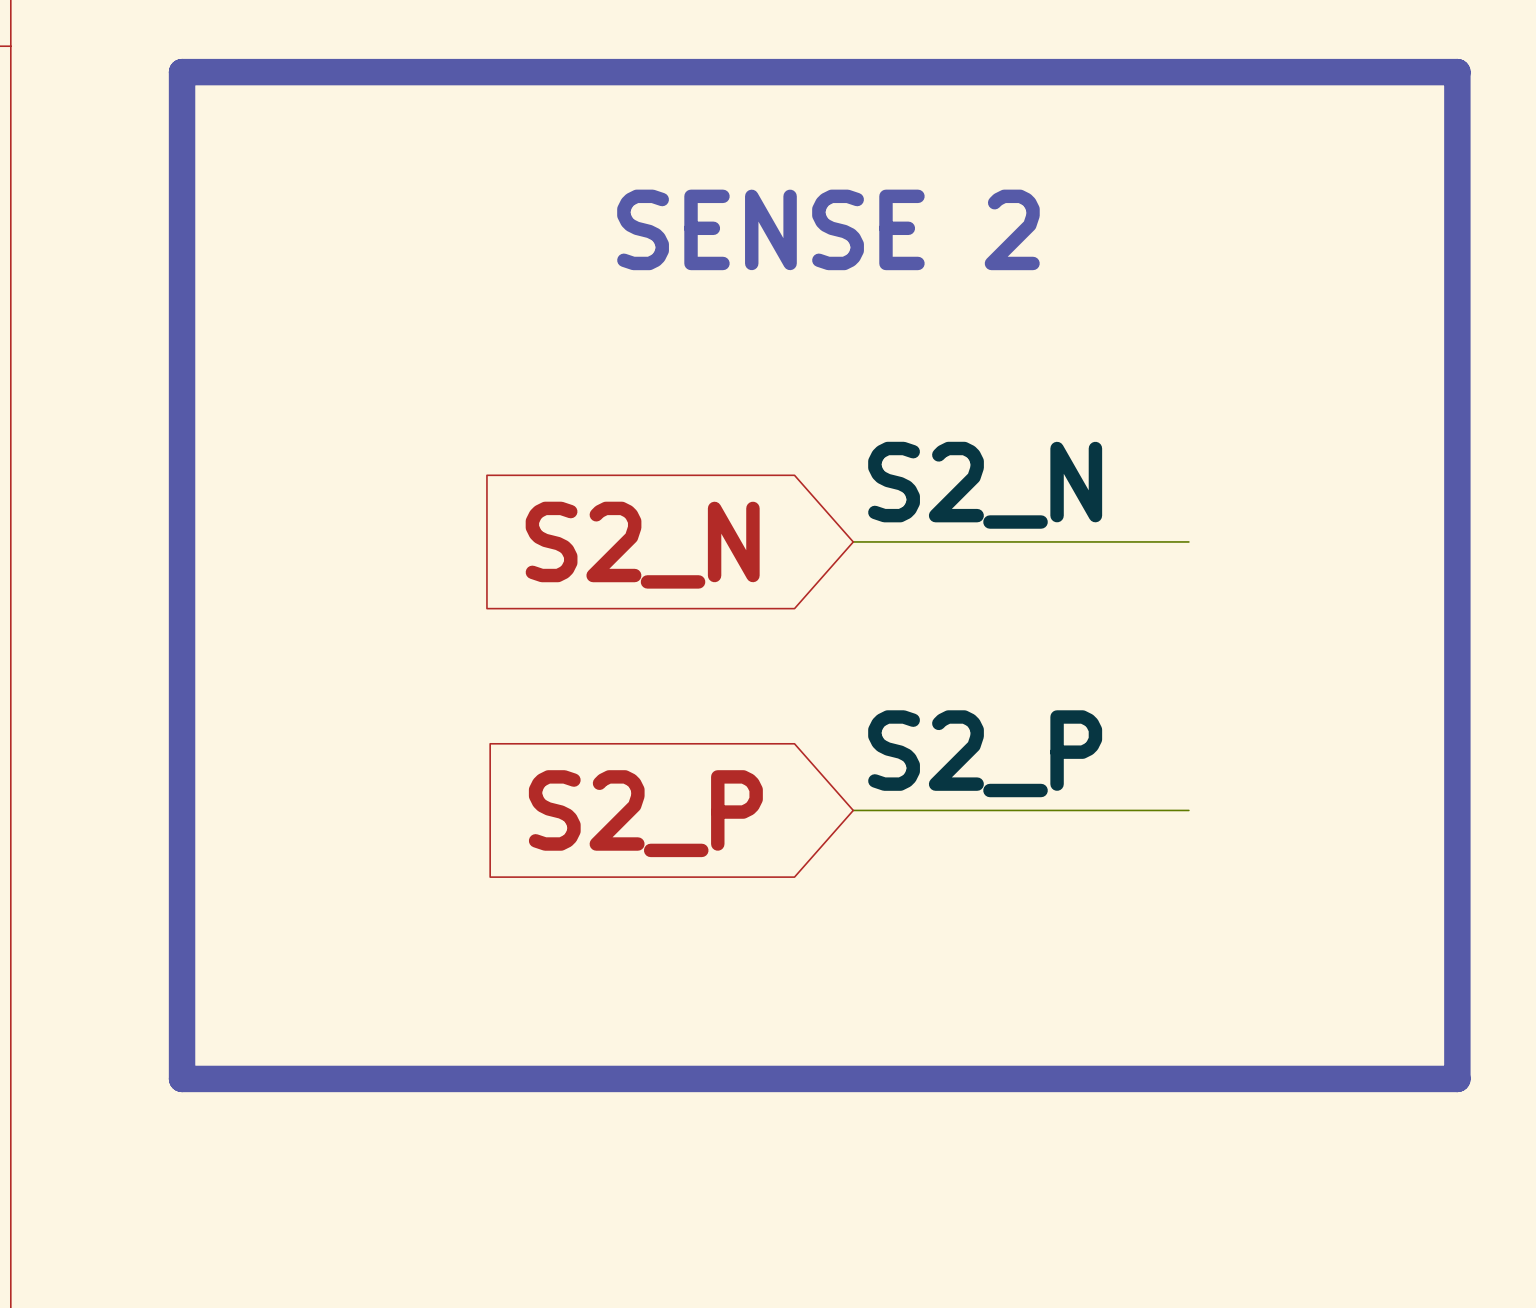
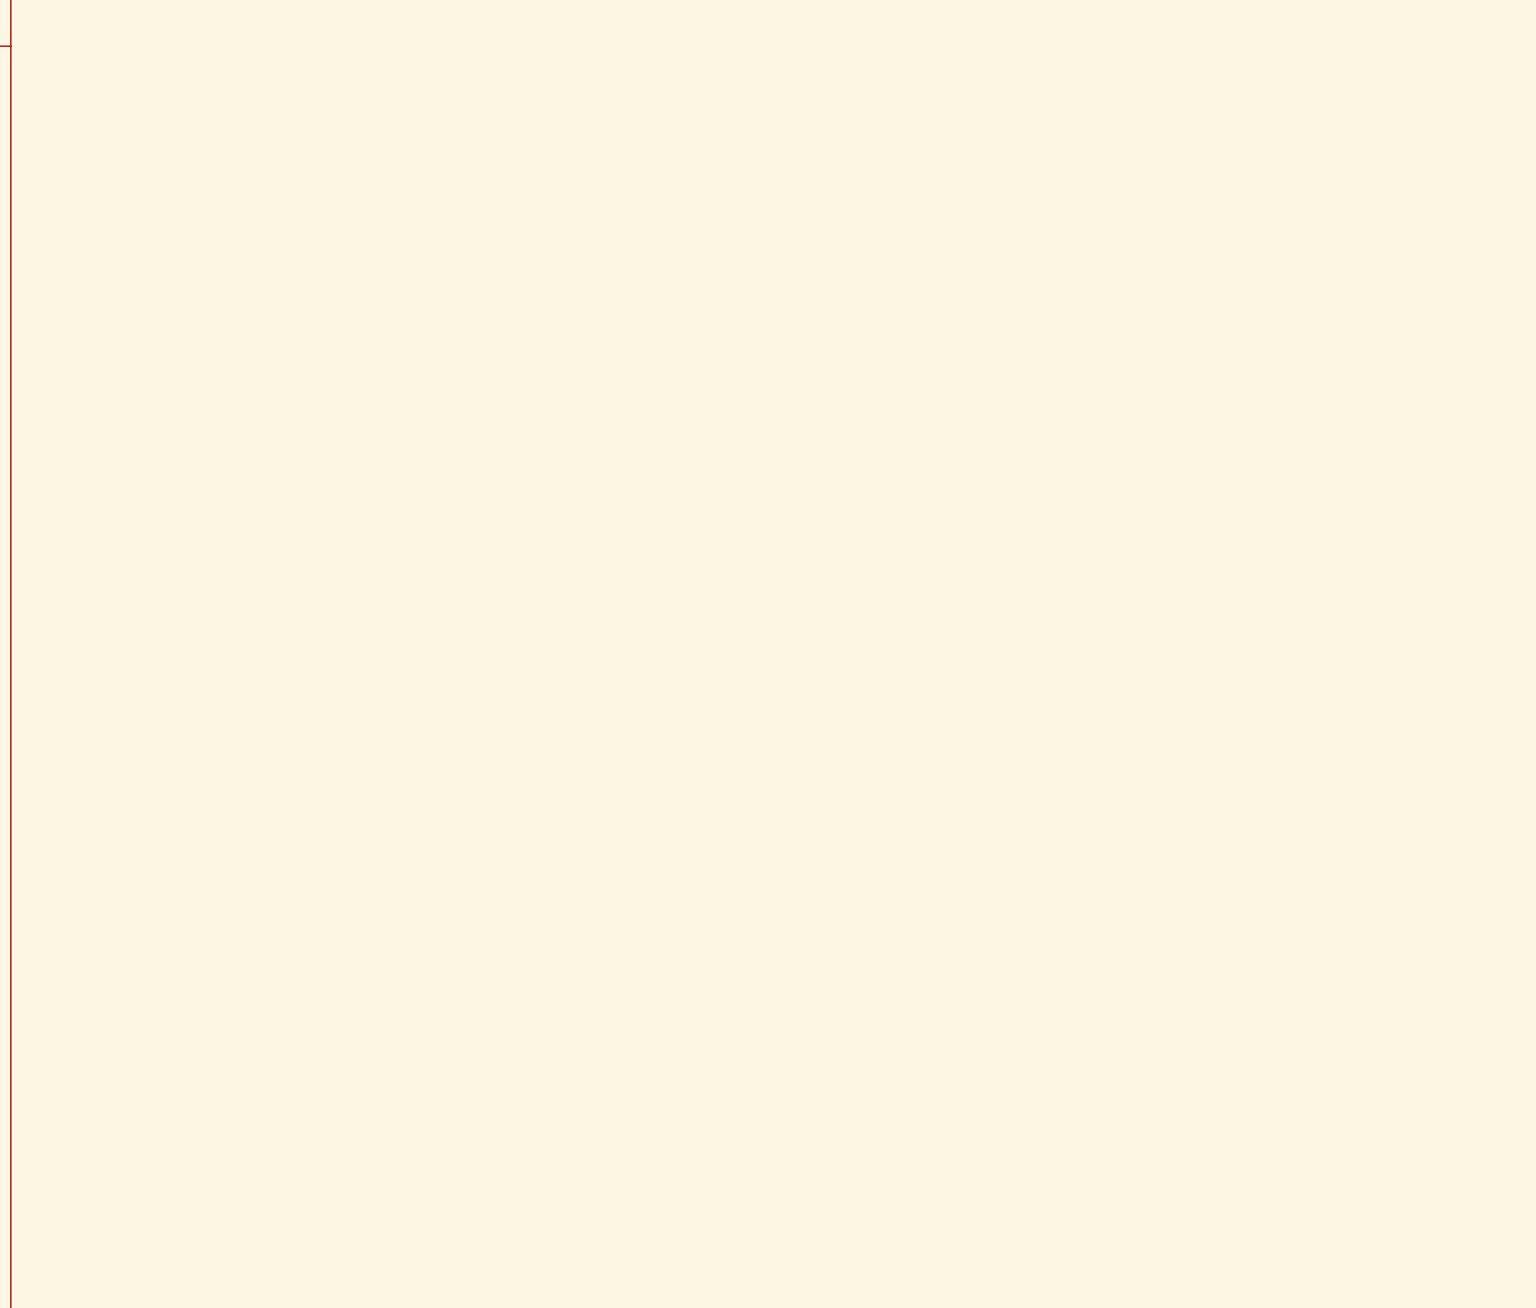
line: (182, 72) (1457, 72) (1457, 1078) (182, 1078) (182, 72) -> none
text: SENSE 2 (828, 229) -> none
label: S2_N (985, 485) -> none
wire: (853, 541) (1188, 541) -> none
global label: S2_N (642, 545) -> none
label: S2_P (985, 753) -> none
wire: (853, 810) (1188, 810) -> none
global label: S2_P (645, 813) -> none

